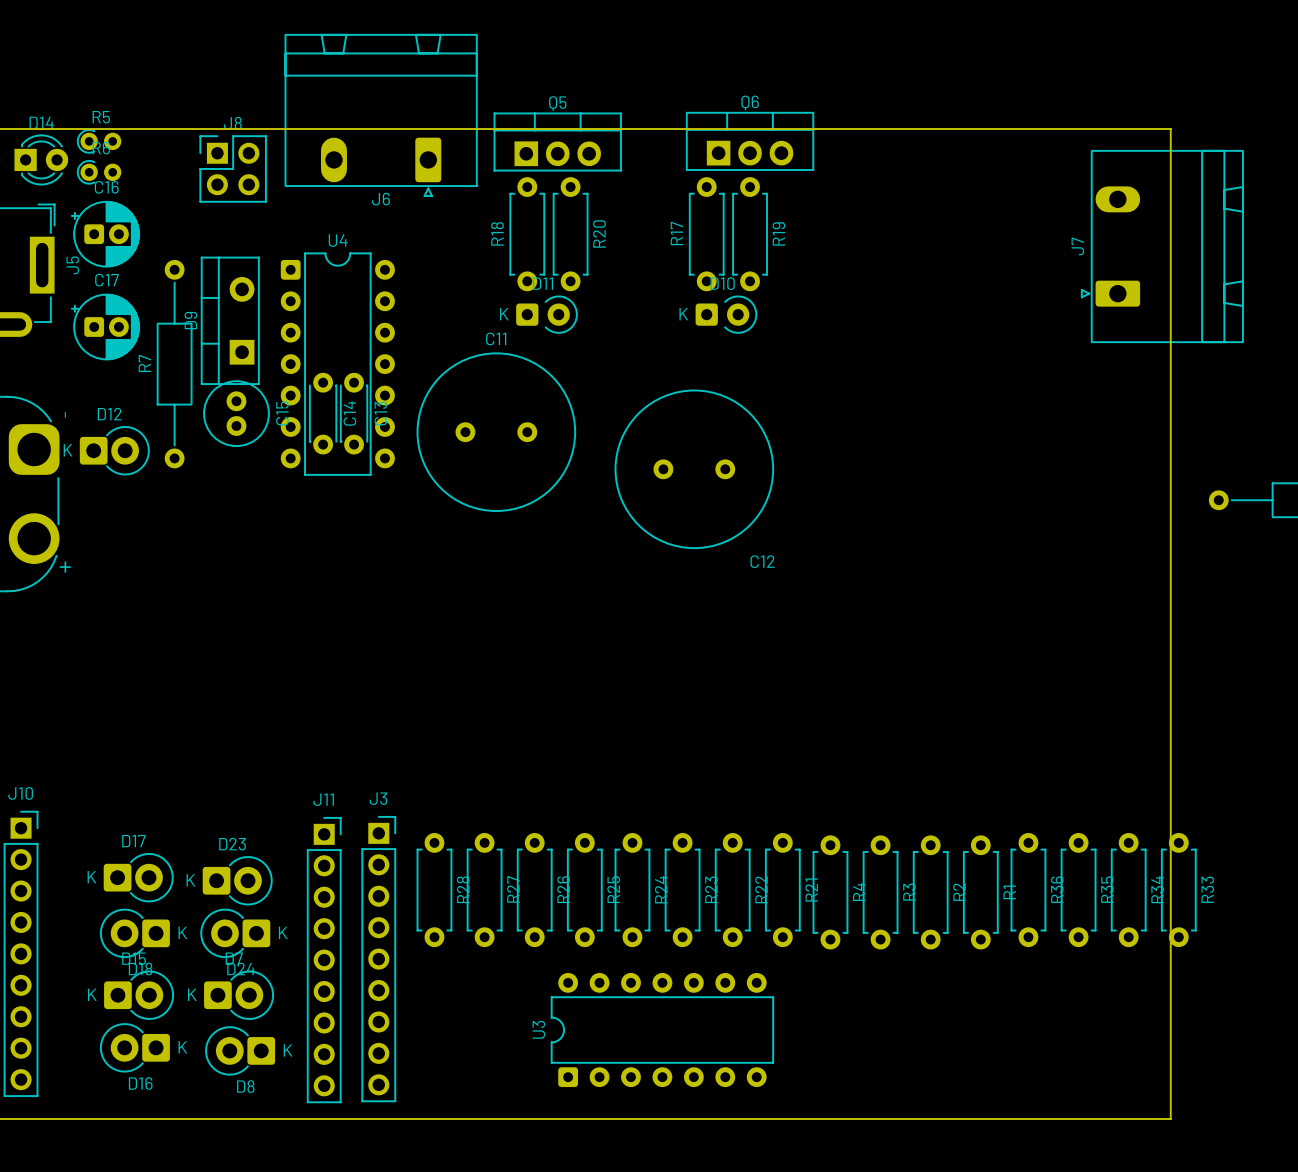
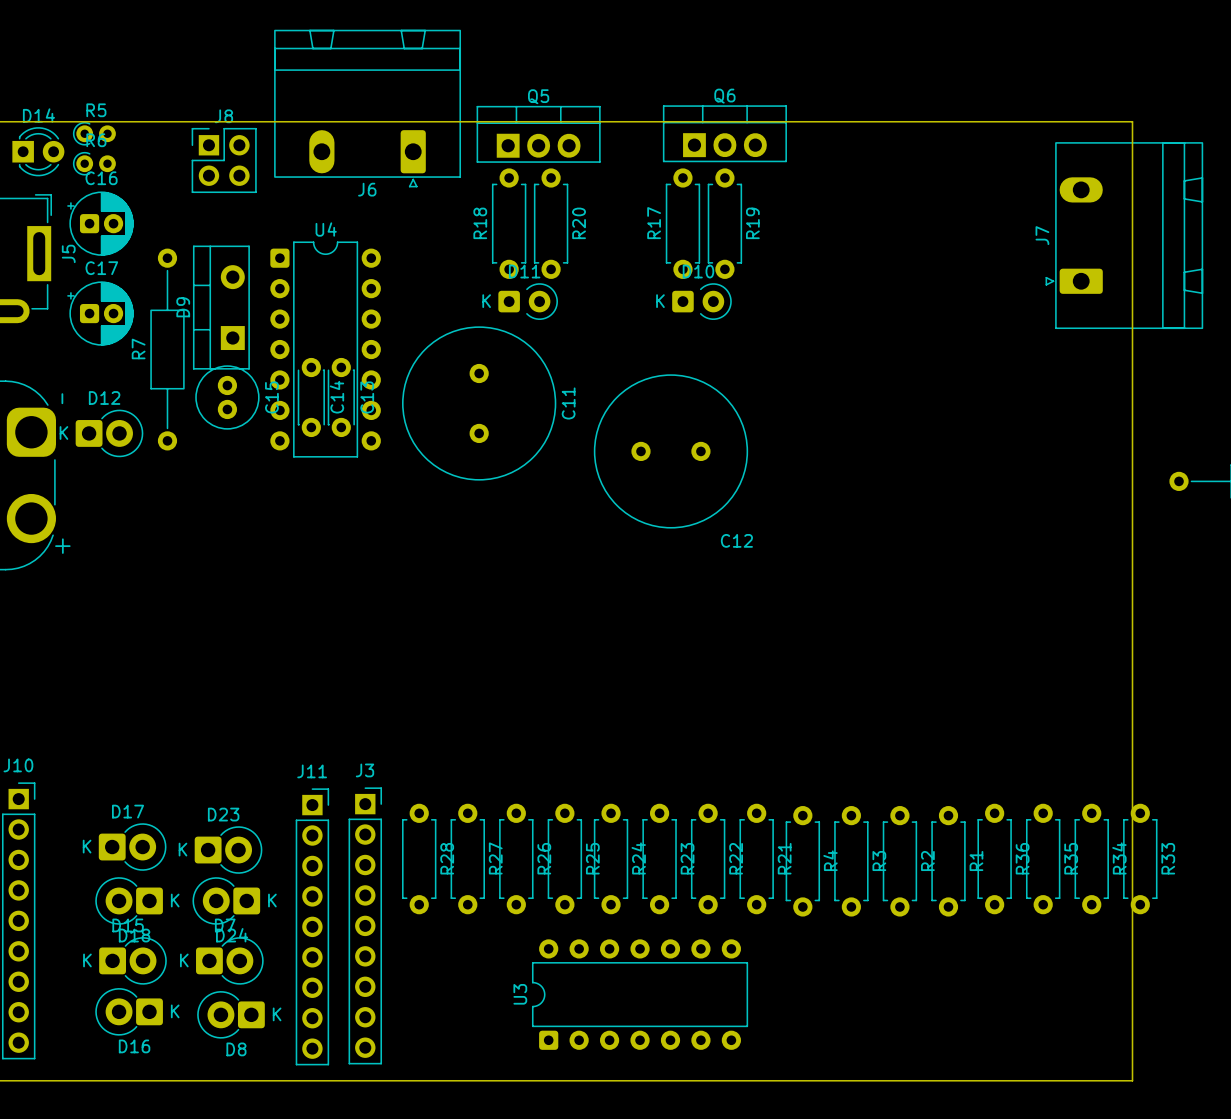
C11 rotation: 0° (496, 432) -> 90° clockwise (479, 403)

